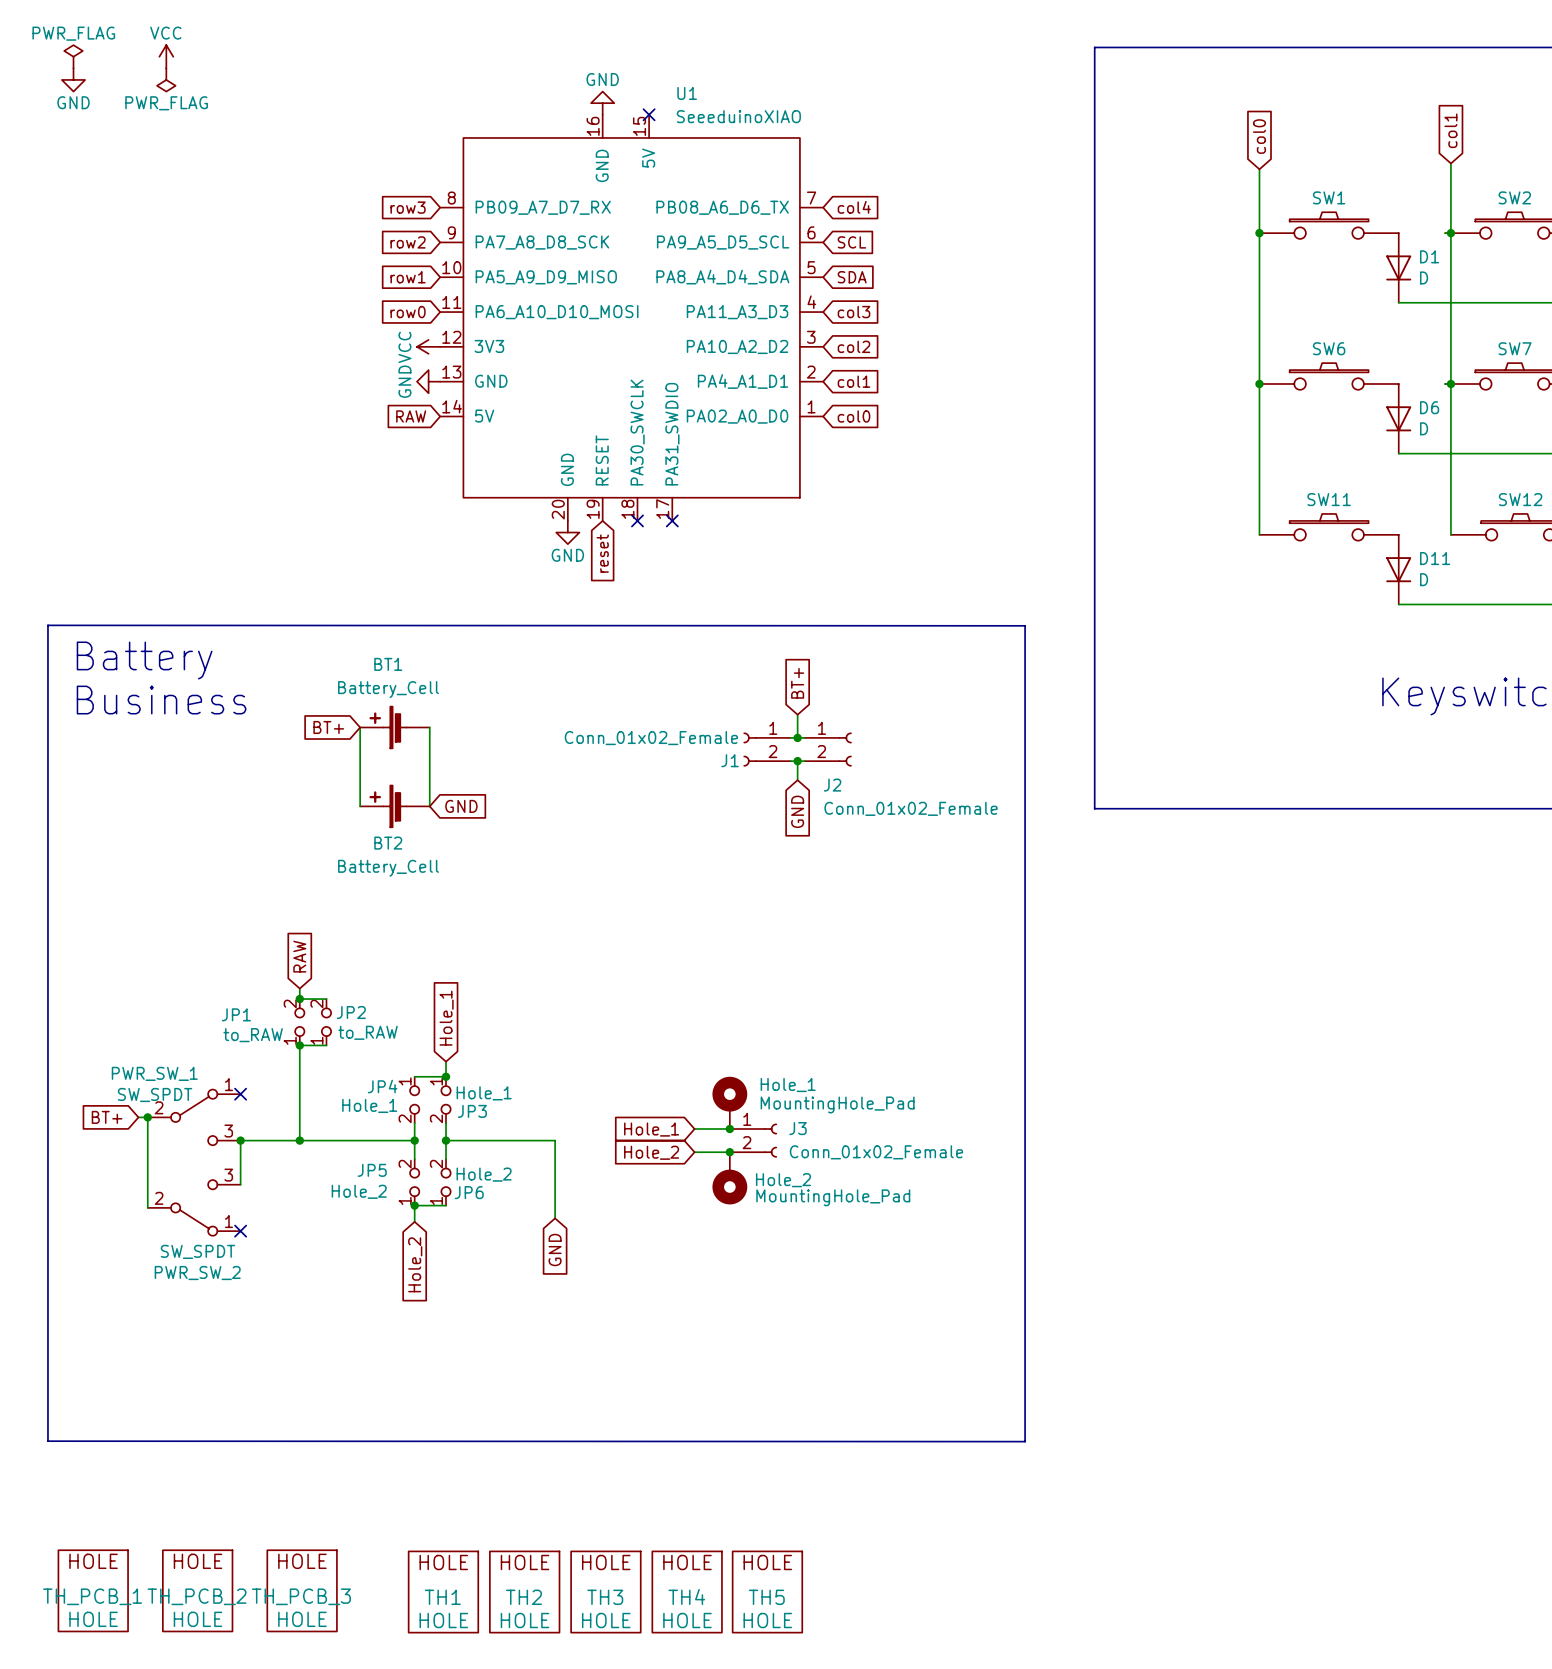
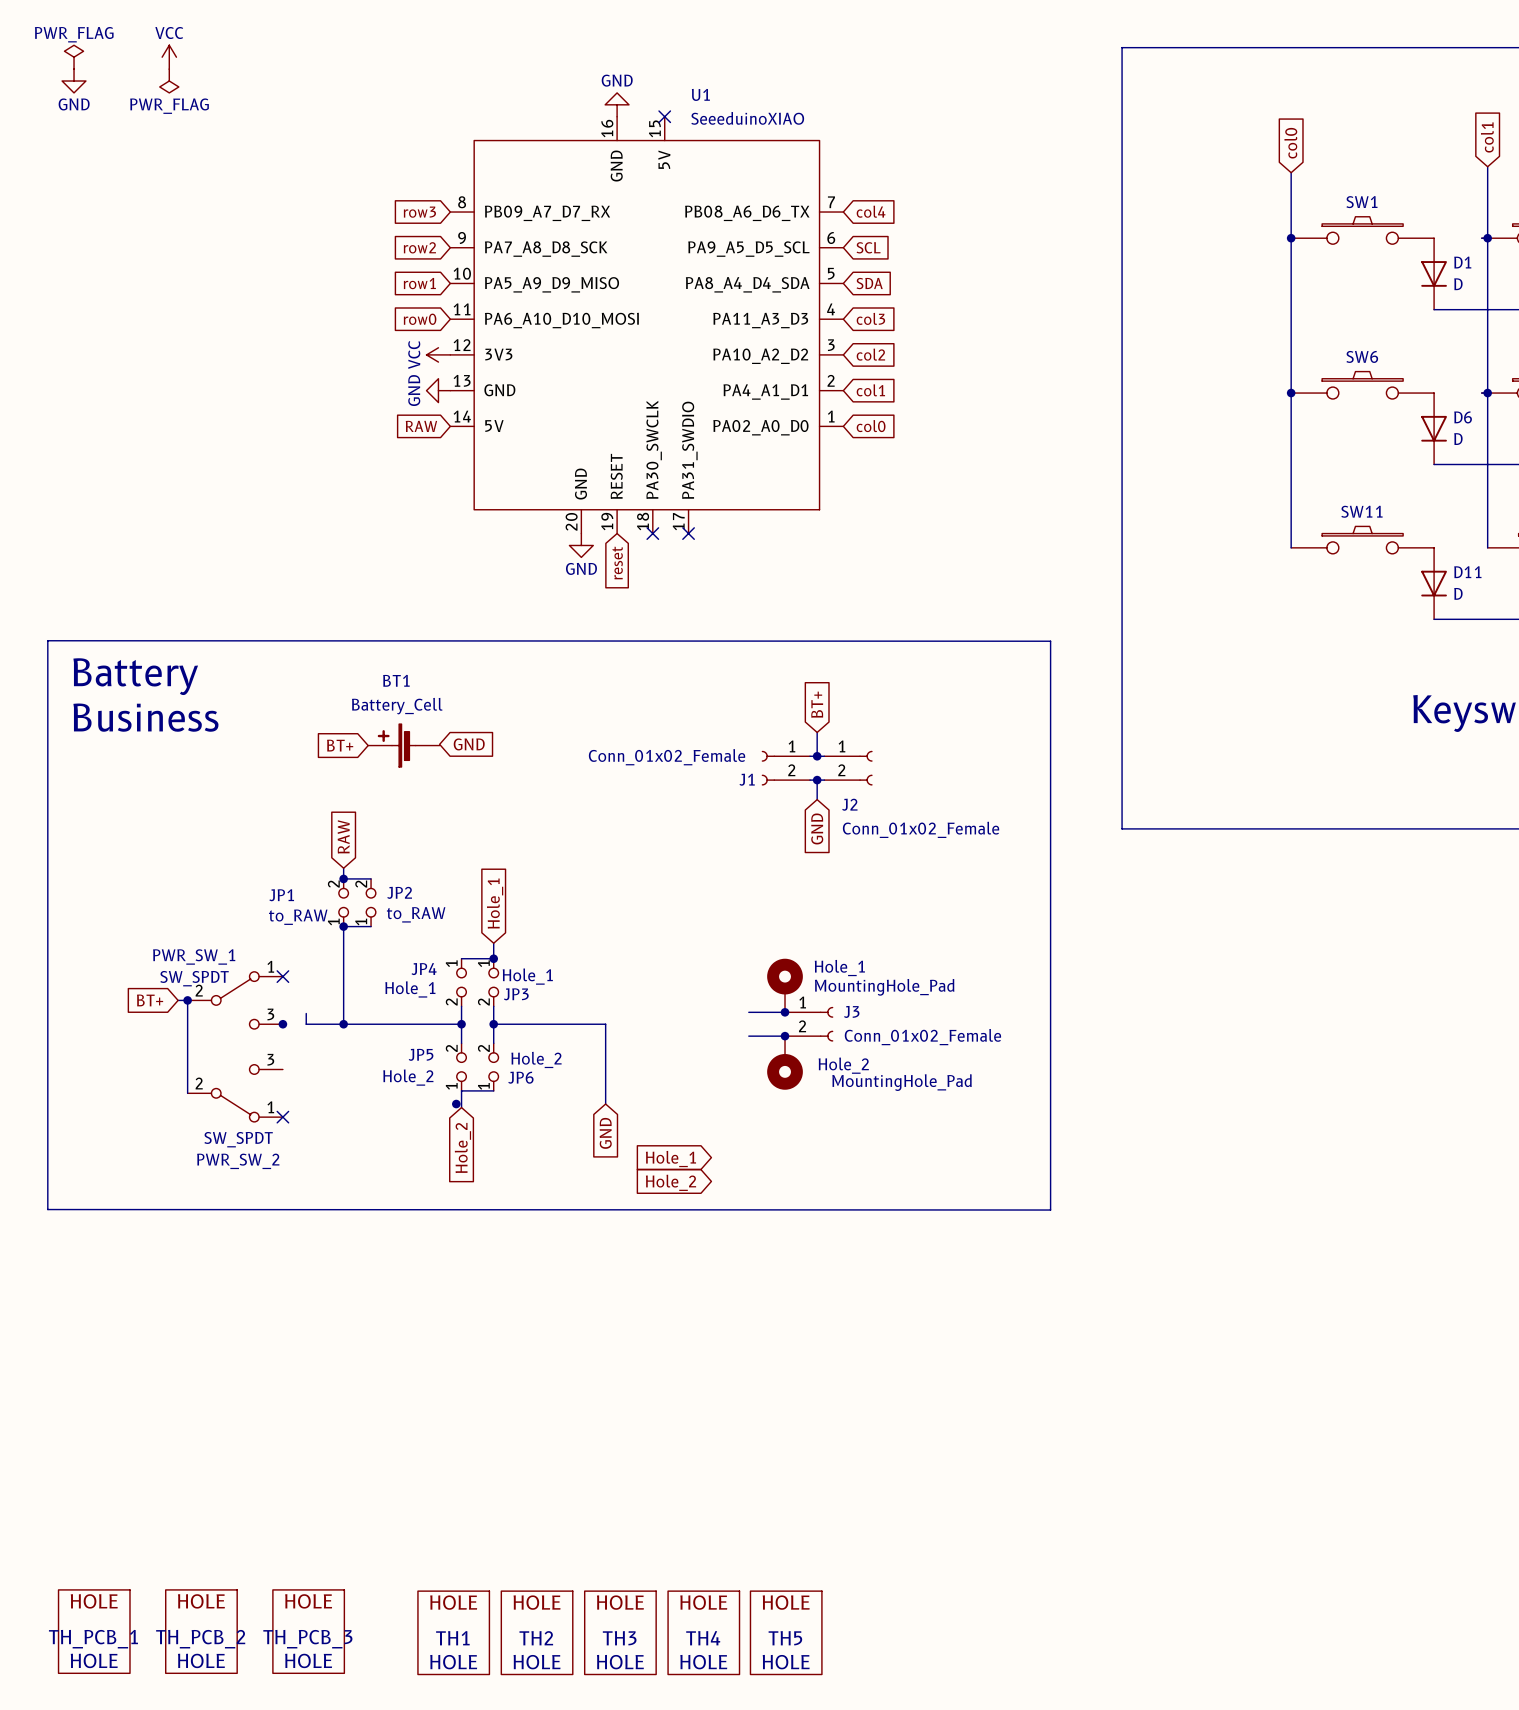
wire: (360, 727) (360, 806) -> none
wire: (429, 727) (429, 806) -> none
BT2: Battery_Cell (394, 806) -> none
global label position: GND (461, 806) -> GND (469, 744)
wire: none -> (343, 868) (343, 878) (371, 878)
junction: none -> (343, 878)
junction: none -> (343, 926)
junction: none -> (493, 958)
no-connect mark: none -> (282, 976)
global label position: RAW (299, 956) -> RAW (343, 836)
junction: none -> (187, 1000)
junction: none -> (785, 1012)
junction: none -> (282, 1024)
junction: (299, 999) -> none
wire: none -> (333, 1024) (461, 1024)
junction: none -> (343, 1024)
junction: none -> (461, 1024)
junction: none -> (493, 1024)
junction: none -> (785, 1036)
global label position: Hole_1 (446, 1018) -> Hole_1 (495, 903)
JP1 position: (299, 1022) -> (343, 902)
JP2 position: (326, 1022) -> (371, 902)
junction: (299, 1045) -> none
wire: (326, 1045) (299, 1045) (299, 1140) -> (371, 926) (343, 926) (343, 1024)
wire: (446, 1061) (446, 1076) (414, 1076) -> (493, 943) (493, 958) (461, 958)
no-connect mark position: (240, 1094) -> (282, 1117)
JP4 position: (414, 1099) -> (461, 982)
JP3 position: (446, 1099) -> (493, 982)
Hole_1 position: (729, 1102) -> (785, 985)
global label position: BT+ (107, 1117) -> BT+ (150, 1000)
wire: (138, 1117) (147, 1117) (147, 1207) -> (178, 1000) (187, 1000) (187, 1093)
junction: (147, 1117) -> none
PWR_SW_1 position: (194, 1117) -> (235, 1000)
wire: (414, 1123) (414, 1159) -> (461, 1006) (461, 1043)
wire: (446, 1123) (446, 1159) -> (493, 1006) (493, 1043)
wire: (694, 1129) (729, 1129) -> (748, 1012) (785, 1012)
junction: (729, 1129) -> none
junction: (240, 1140) -> none
junction: (299, 1140) -> none
wire: (414, 1140) (240, 1140) (240, 1184) -> none
junction: (414, 1140) -> none
wire: (446, 1140) (555, 1140) (555, 1218) -> (493, 1024) (605, 1024) (605, 1104)
junction: (446, 1140) -> none
J3 position: (753, 1140) -> (809, 1024)
wire: (694, 1152) (729, 1152) -> (748, 1036) (785, 1036)
junction: (729, 1152) -> none
Hole_2 position: (729, 1178) -> (785, 1062)
line: (47, 1179) (47, 1441) (1025, 1441) (1025, 1180) -> (47, 1209) (1050, 1210)
JP5 position: (414, 1182) -> (461, 1067)
JP6 position: (446, 1182) -> (493, 1067)
junction: (414, 1205) -> none
wire: (446, 1205) (414, 1205) (414, 1221) -> (493, 1090) (461, 1090) (461, 1107)
PWR_SW_2 position: (194, 1207) -> (235, 1093)
no-connect mark: (240, 1231) -> none
global label position: GND (555, 1250) -> GND (605, 1133)
global label position: Hole_2 (415, 1264) -> Hole_2 (462, 1148)

